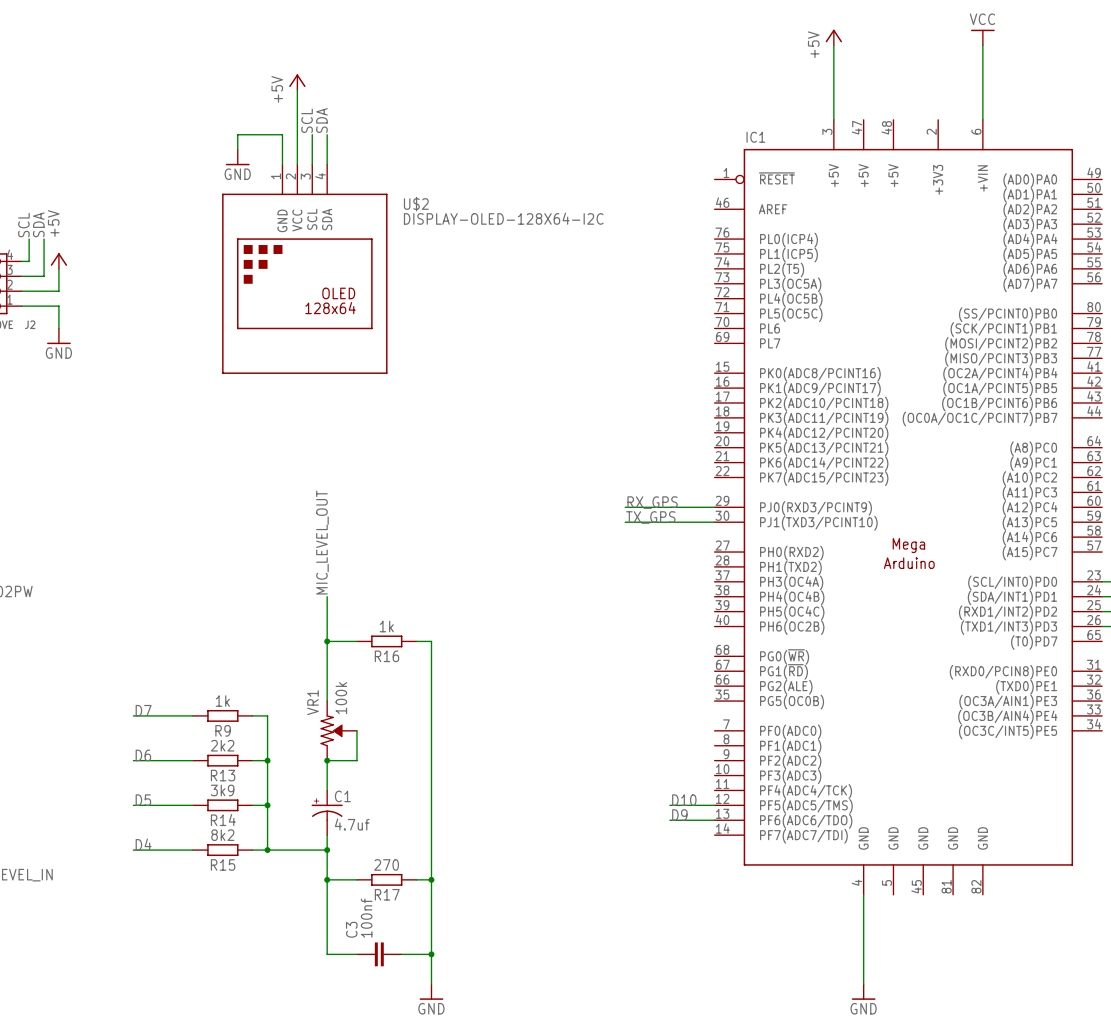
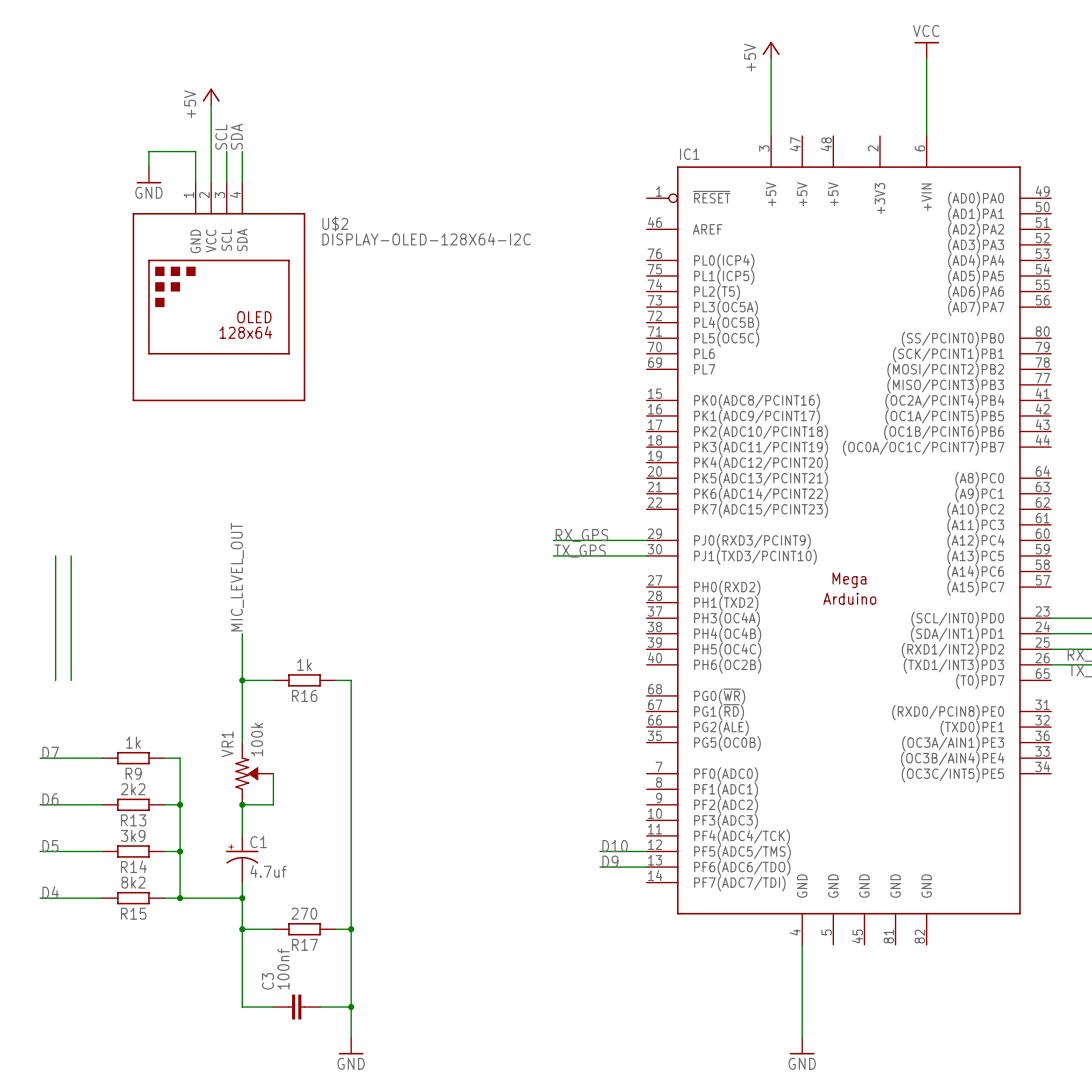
wire: none -> (55, 555) (55, 680)
wire: none -> (71, 555) (71, 680)

